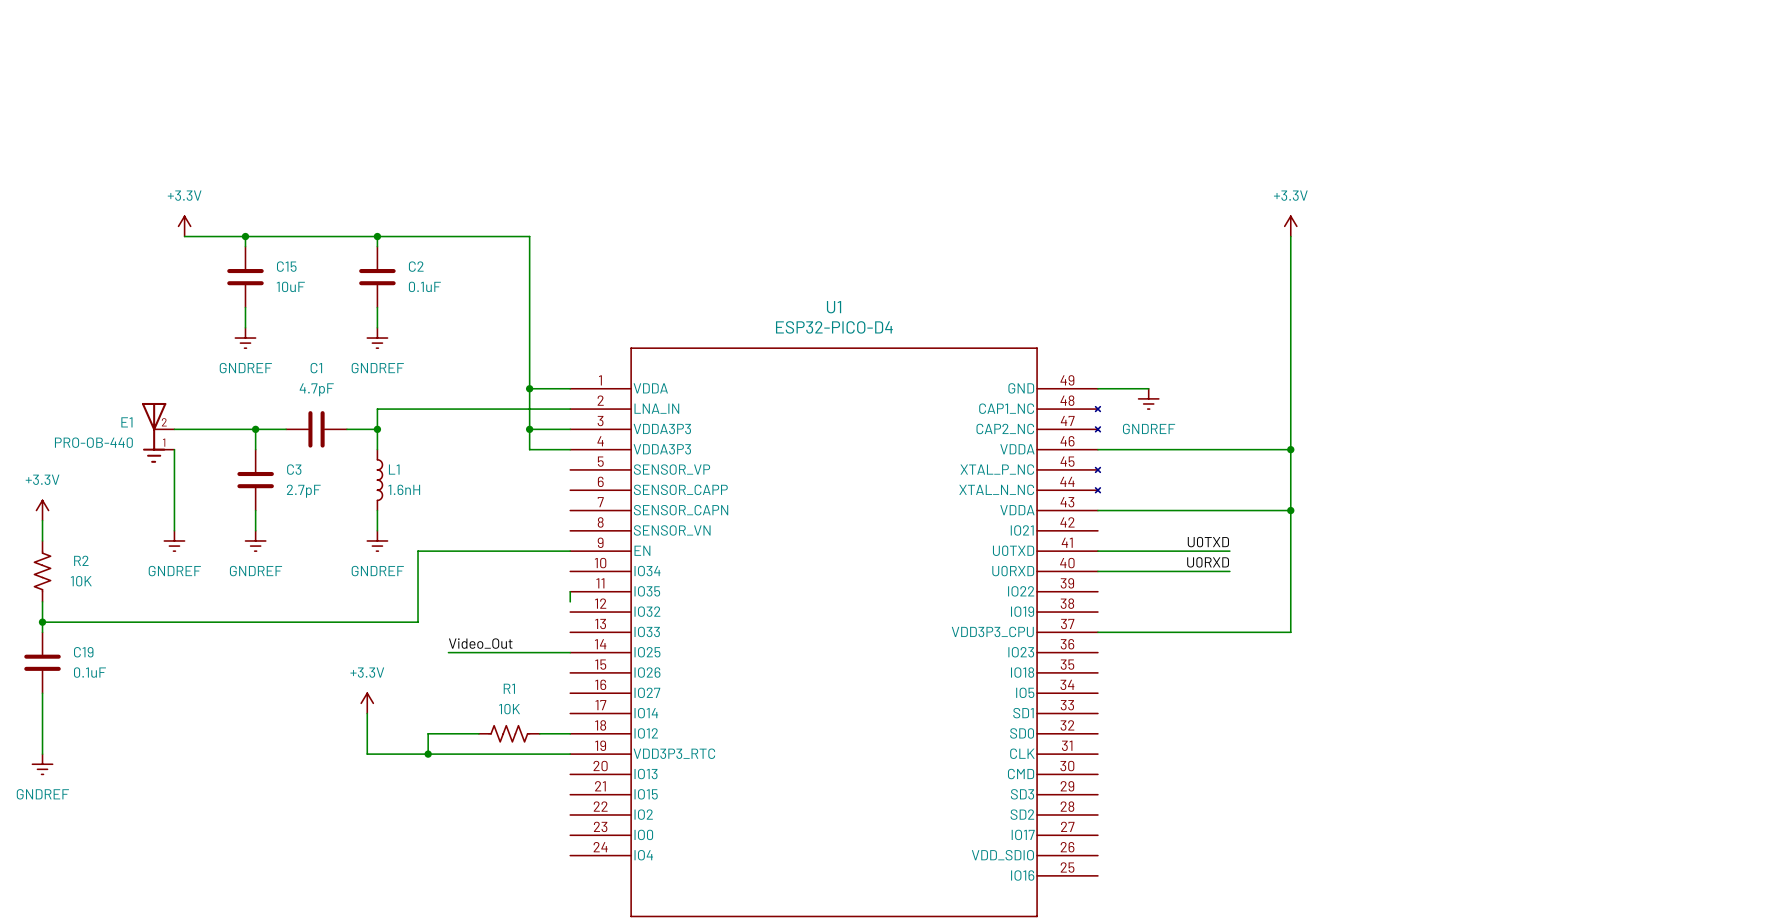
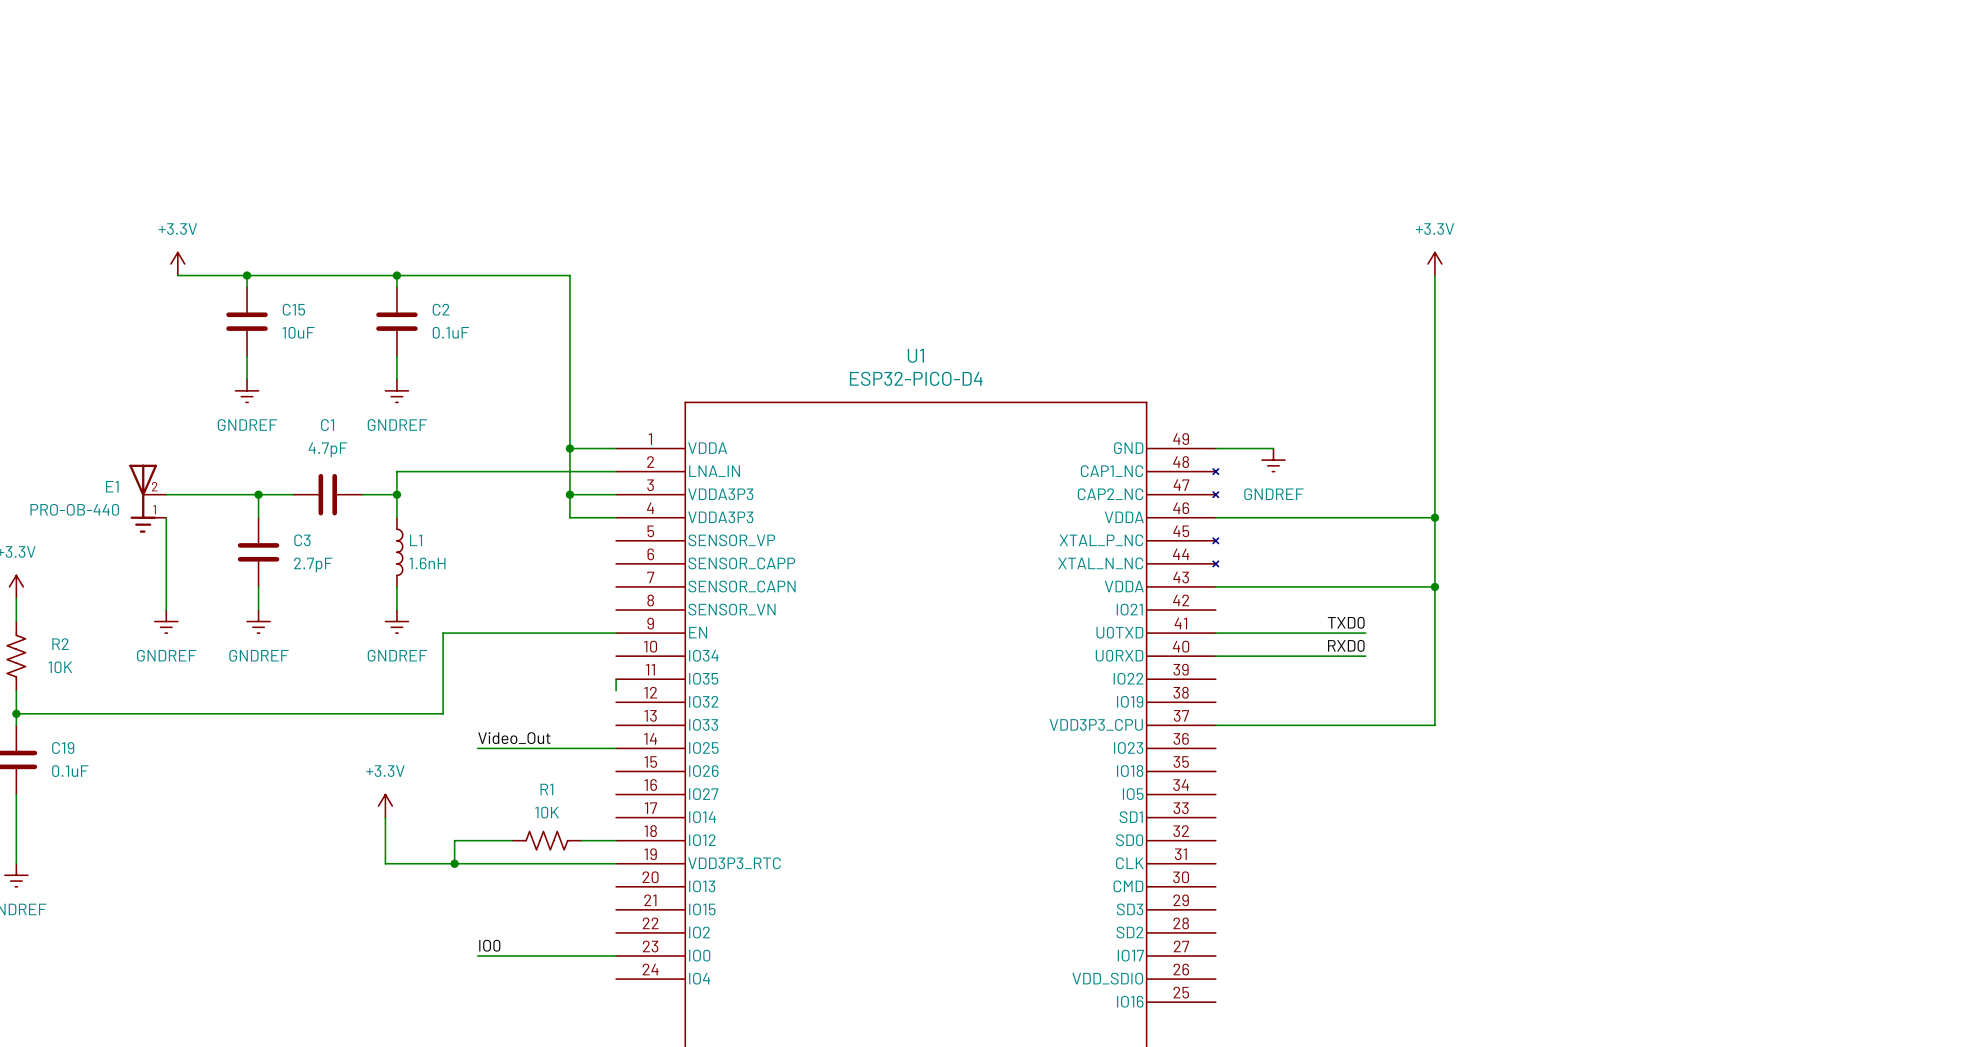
label: U0TXD (1208, 542) -> TXD0 (1346, 622)
label: U0RXD (1208, 562) -> RXD0 (1346, 645)
label: none -> IO0 (489, 945)
wire: none -> (477, 956) (616, 956)

